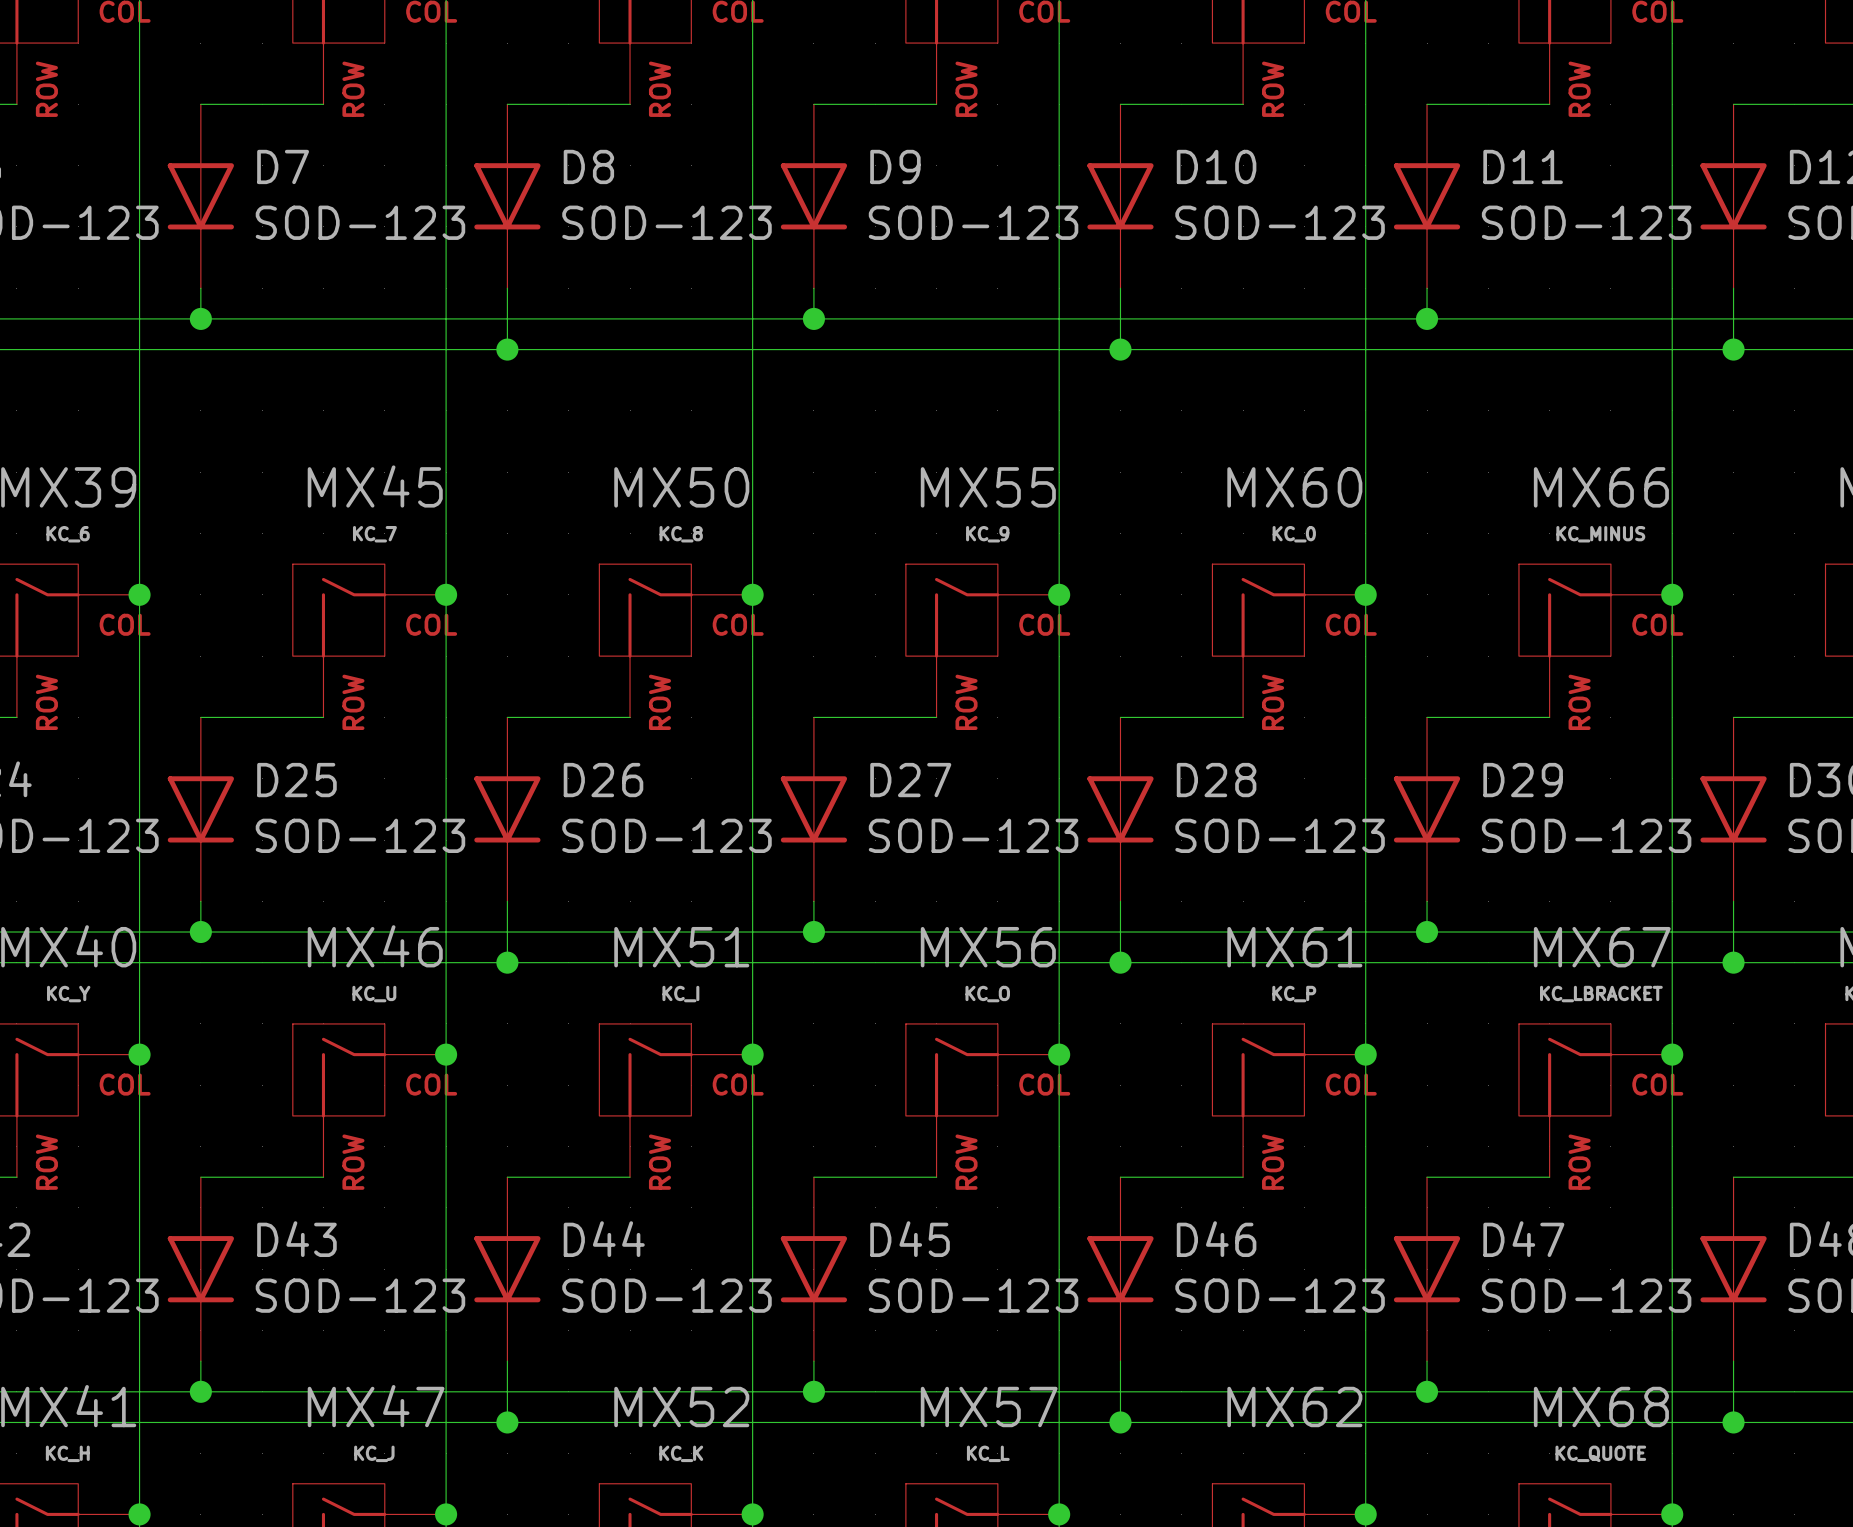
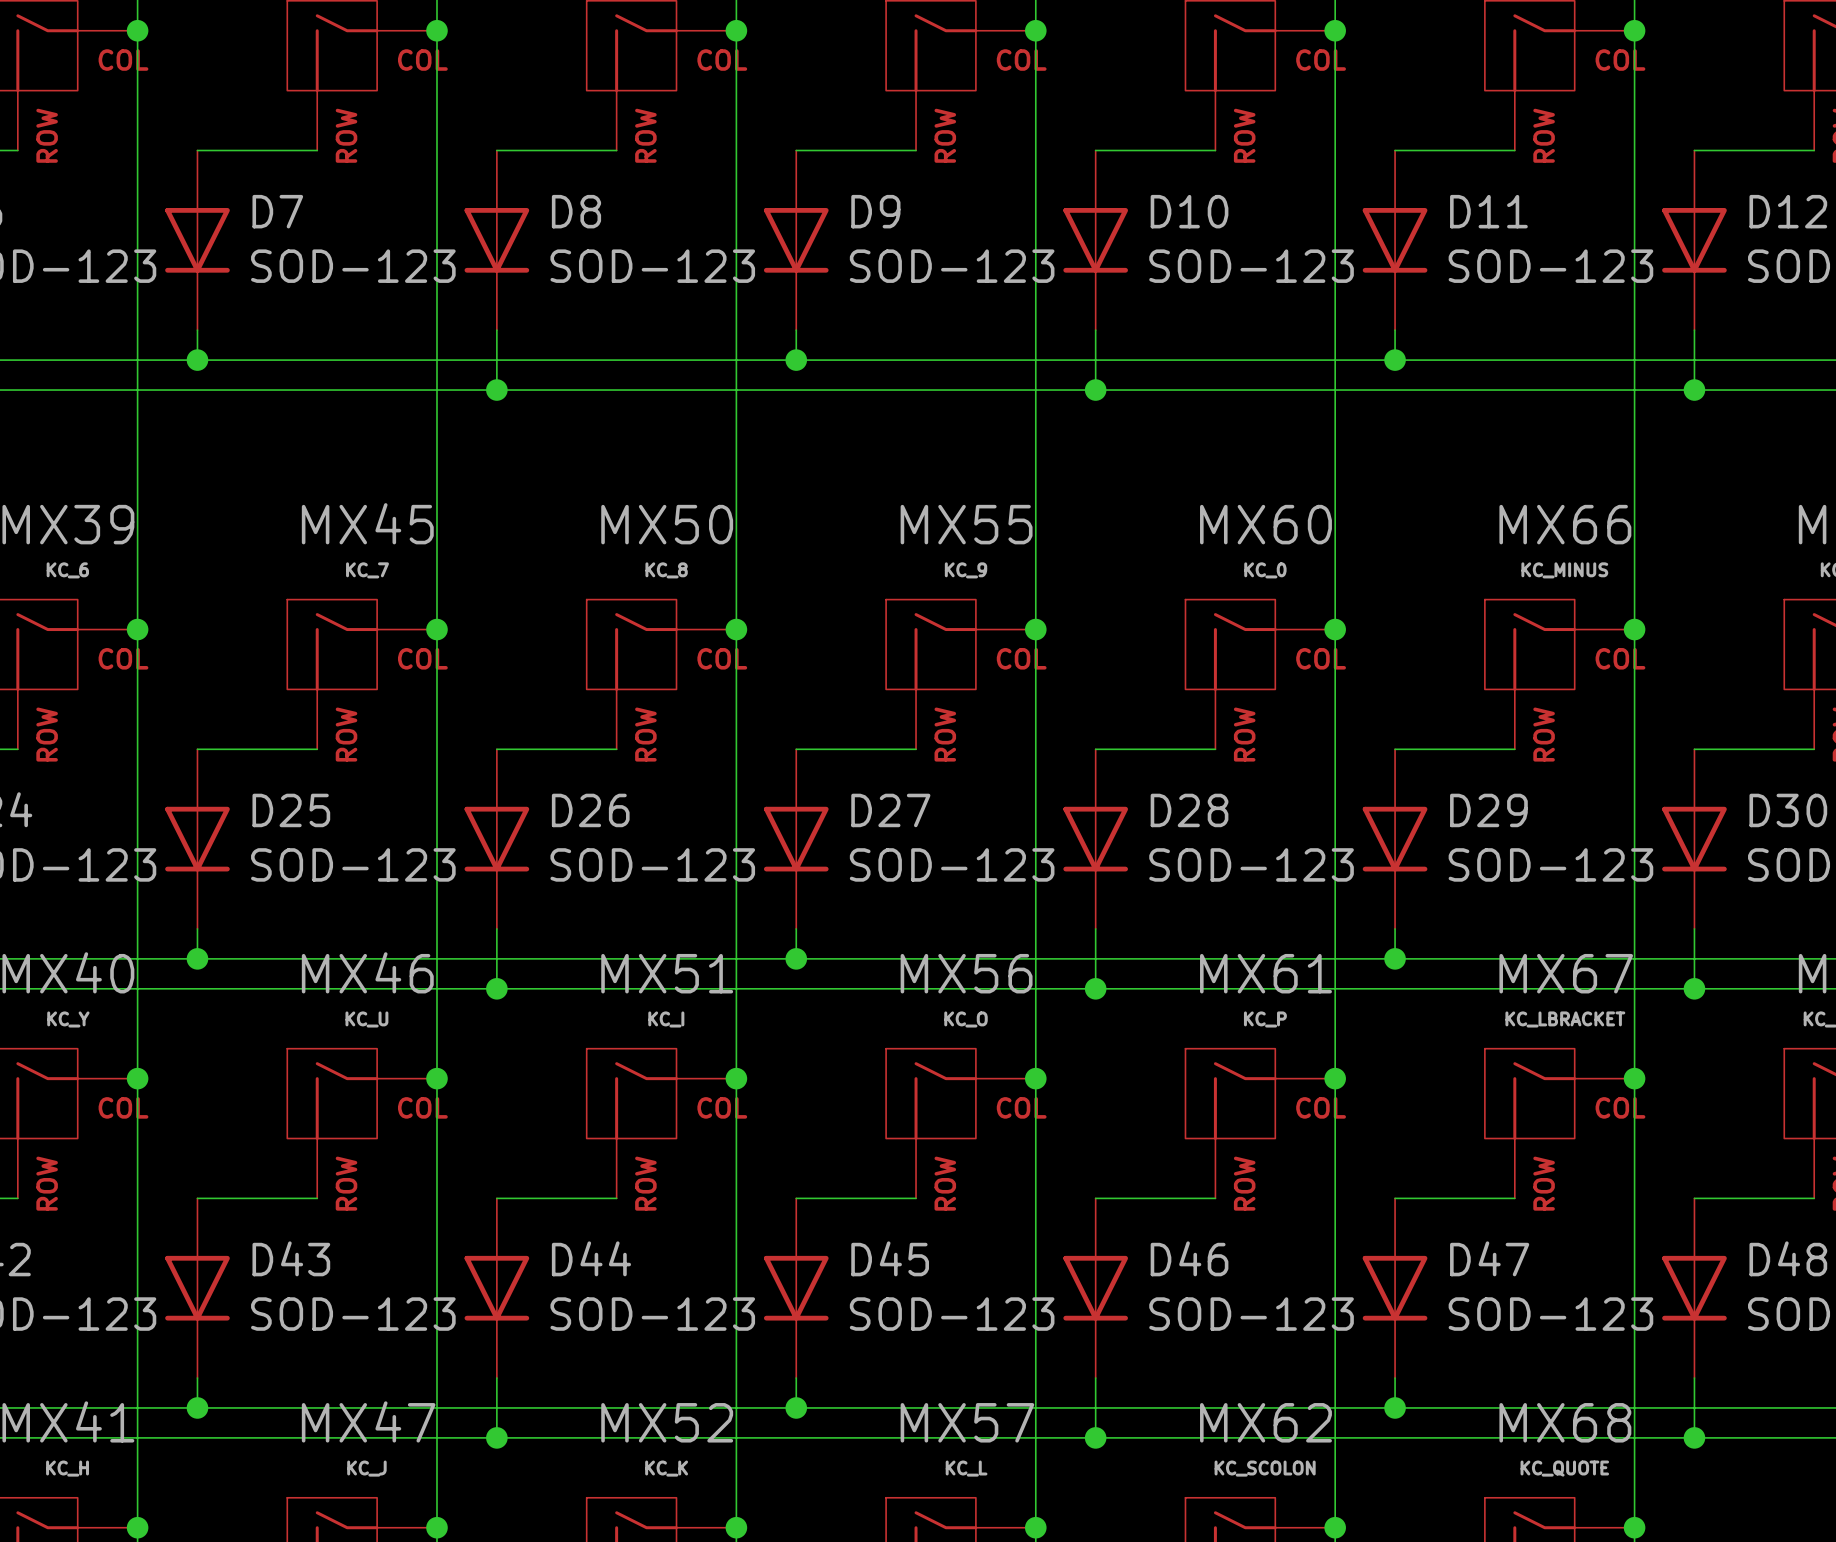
MX62 value: none -> KC_SCOLON (1265, 1468)

